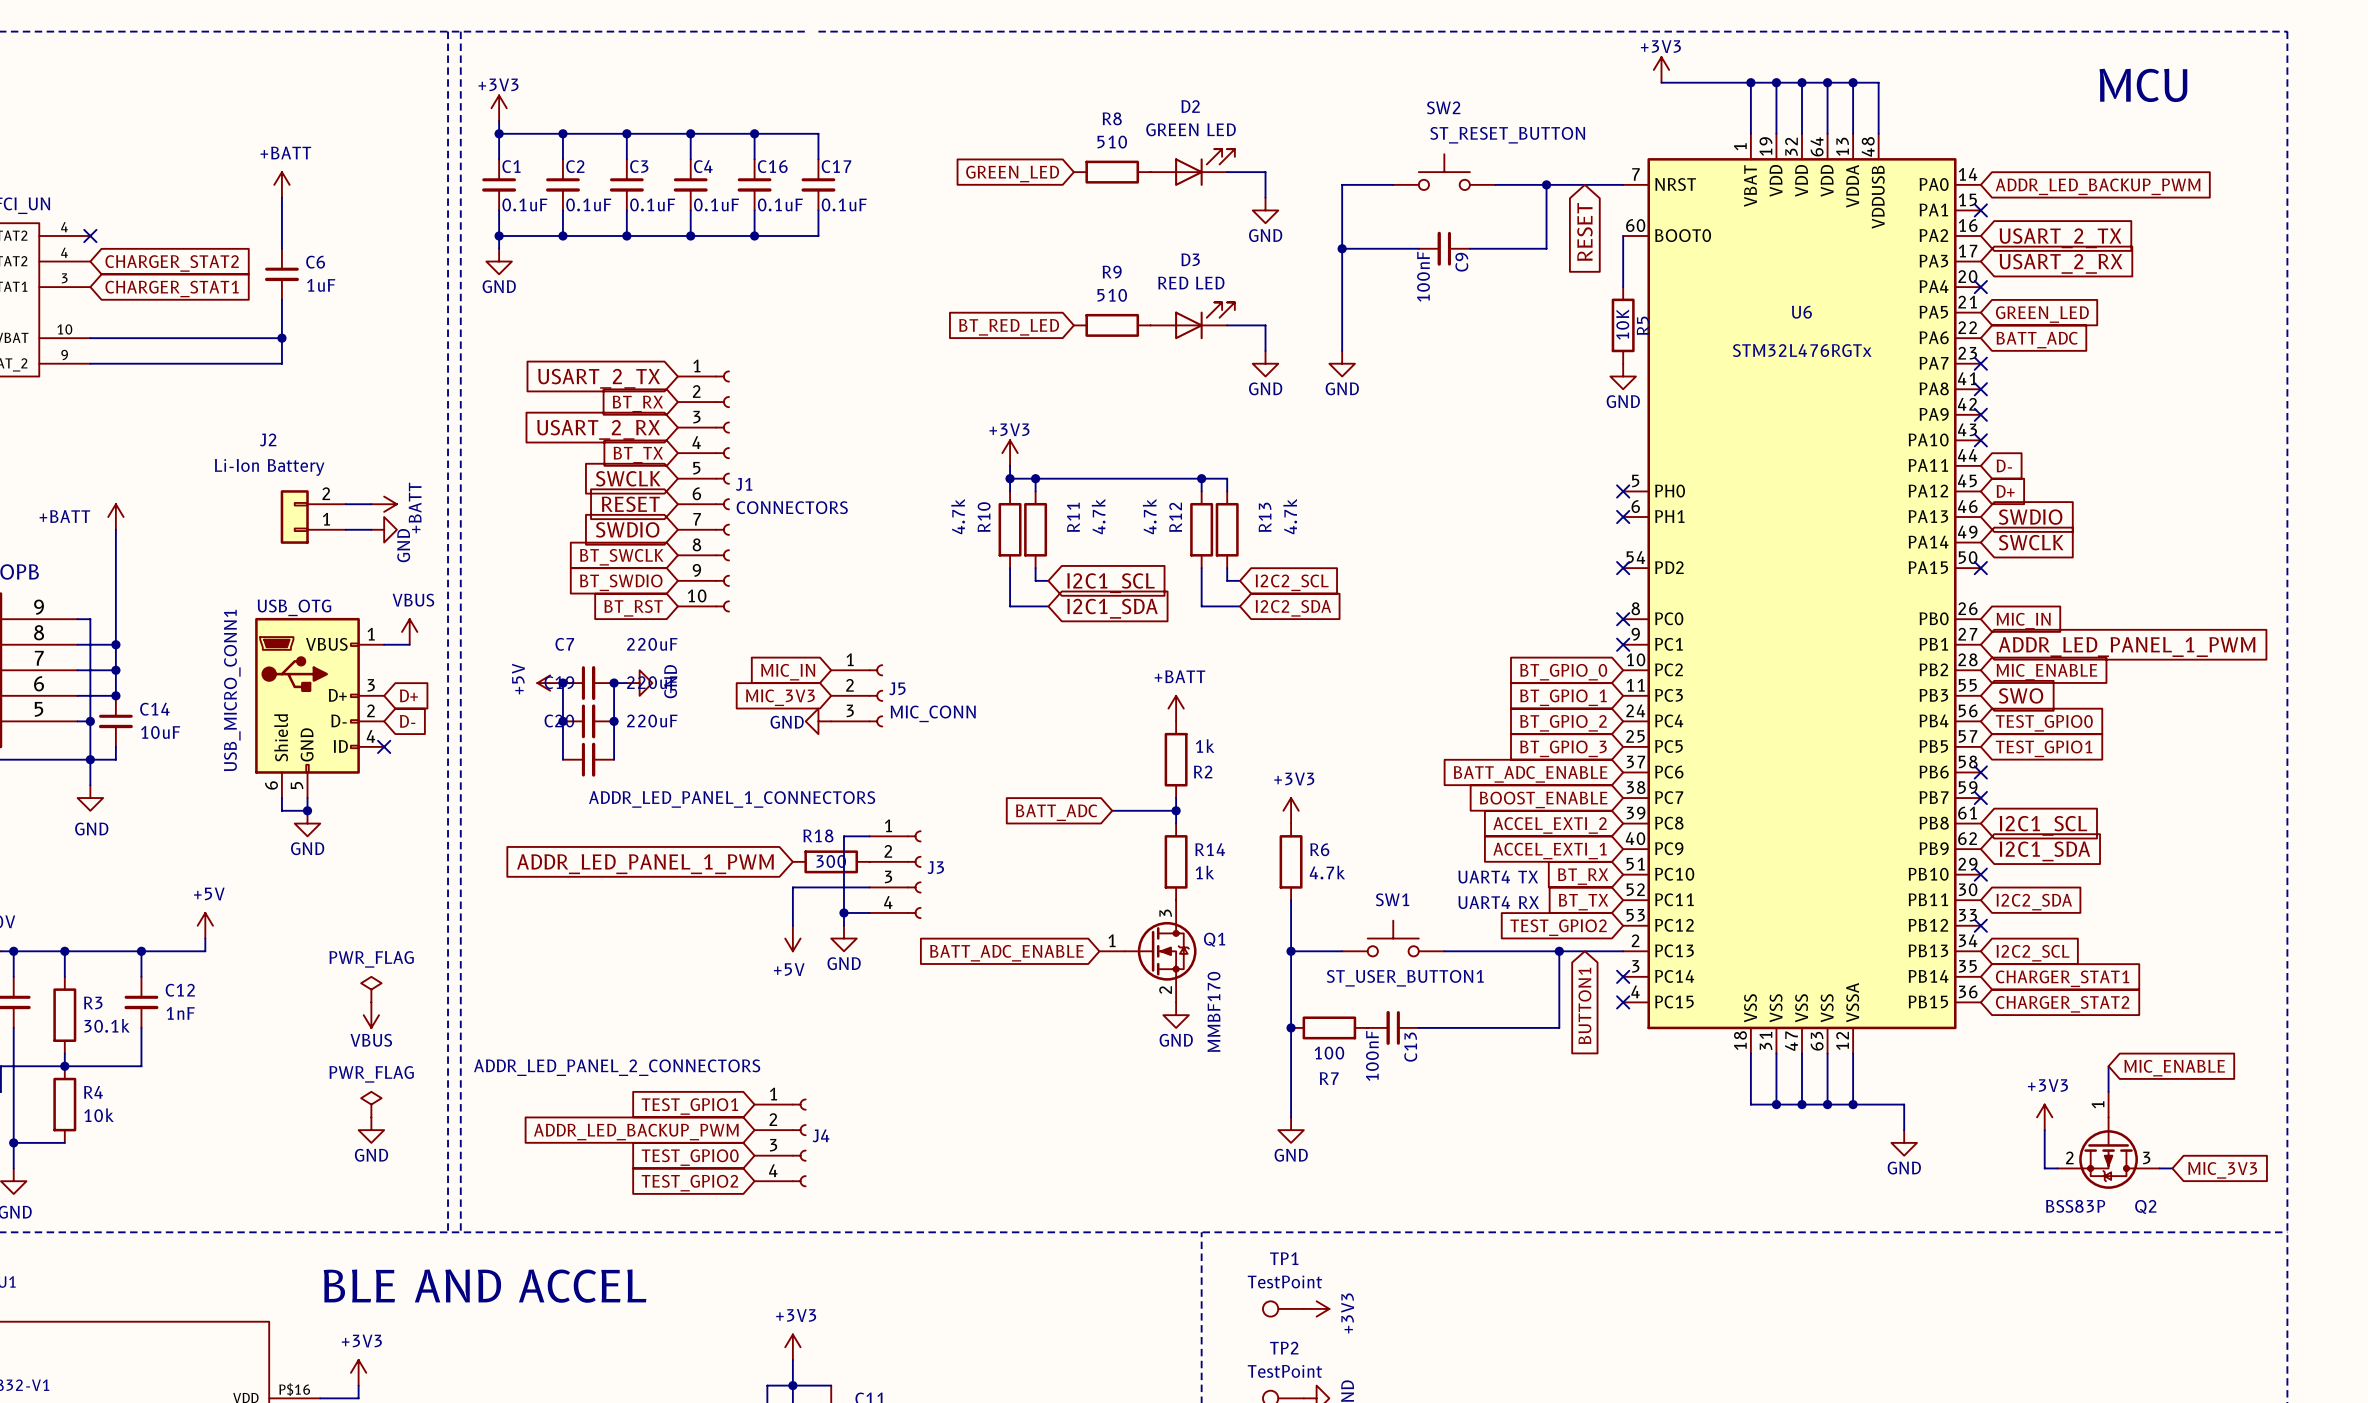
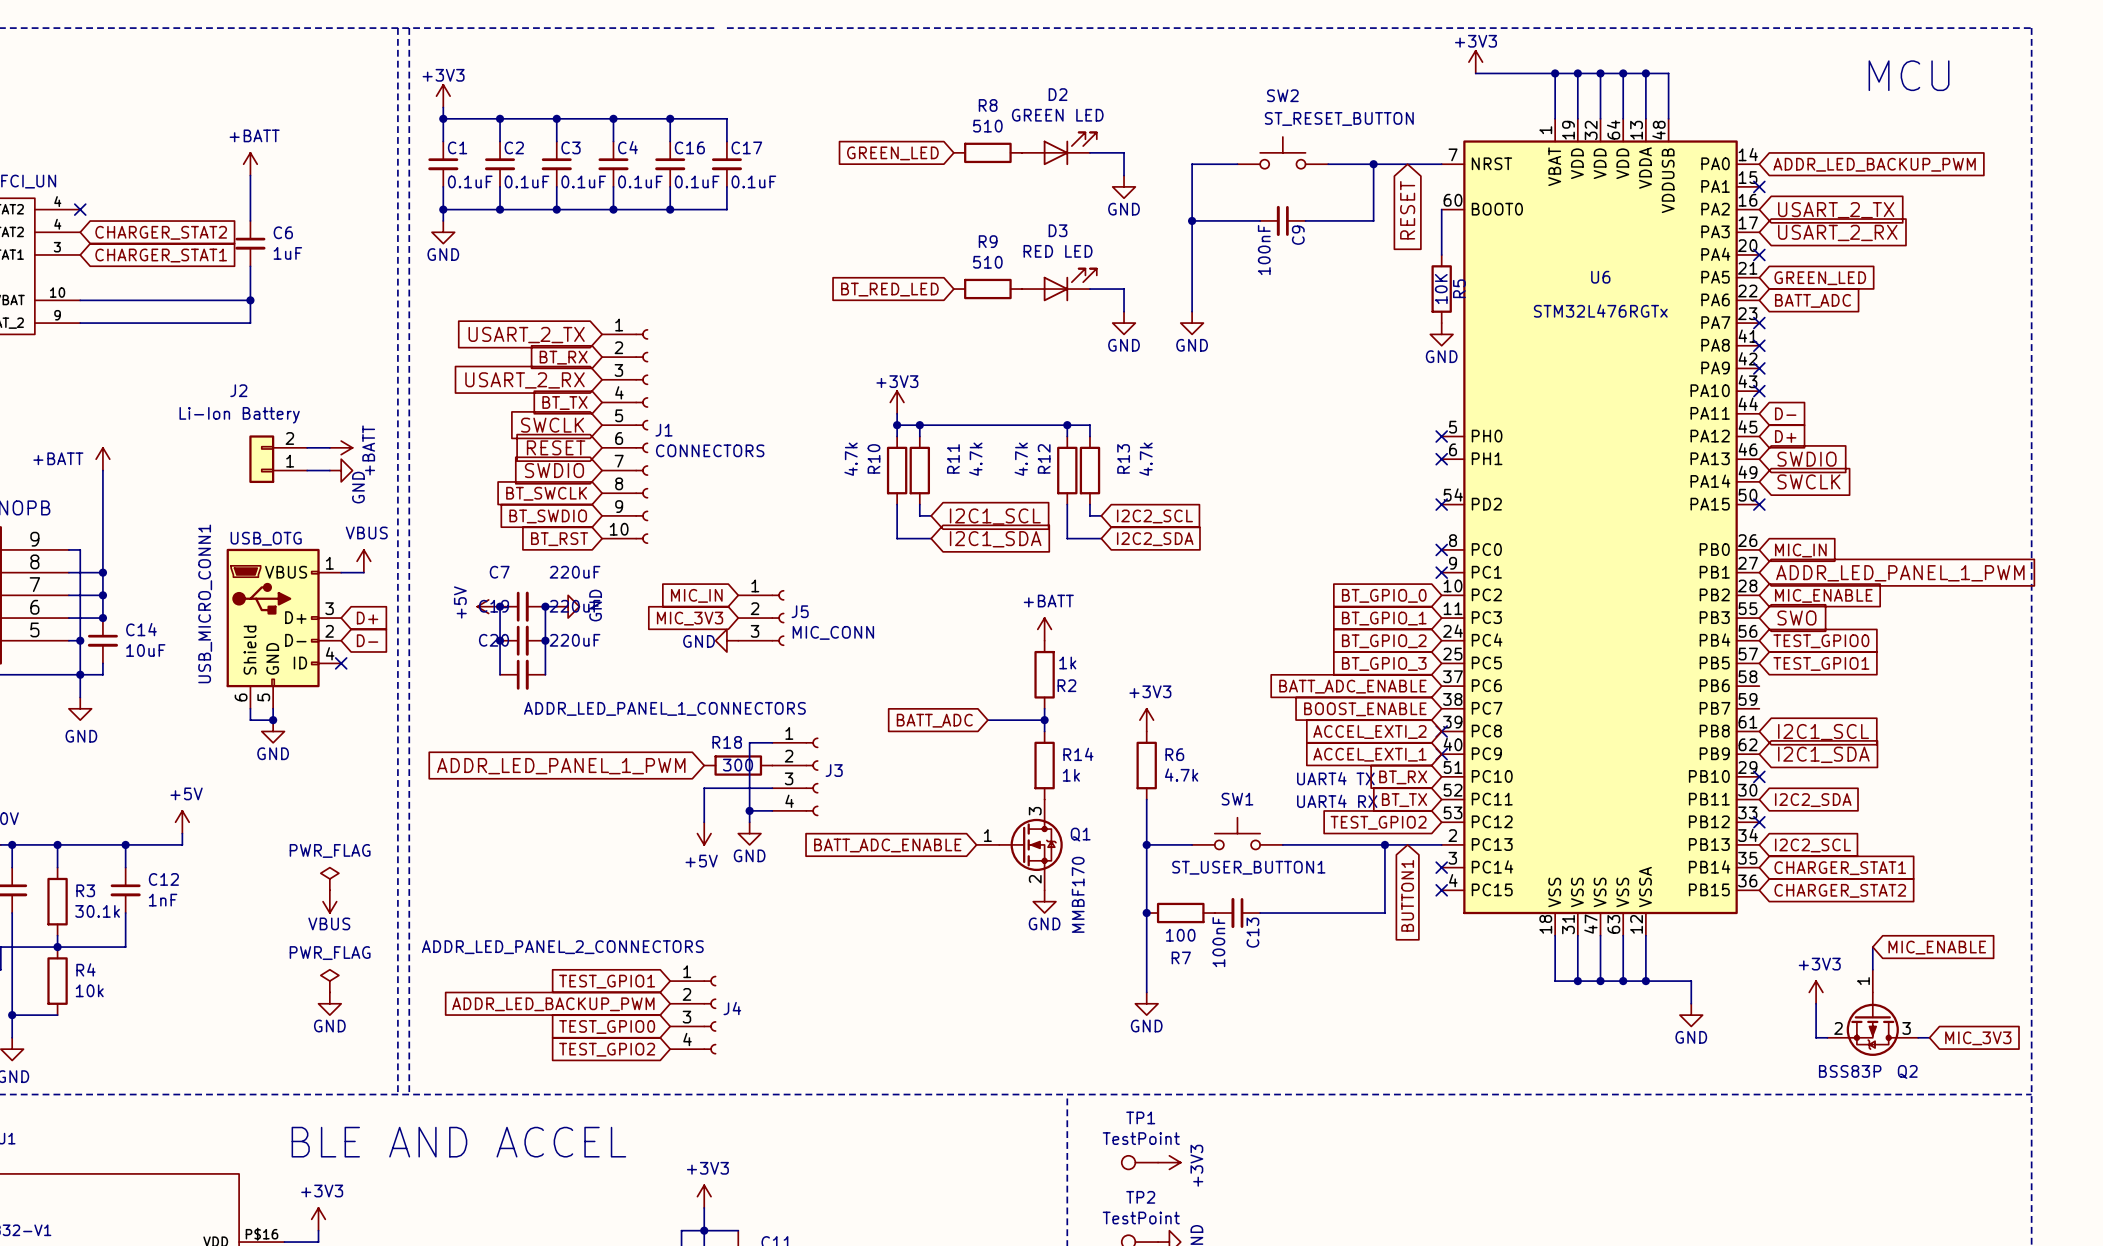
no-connect mark: (1980, 772) -> none
no-connect mark: (1980, 798) -> none
no-connect mark: none -> (1441, 731)
no-connect mark: none -> (1441, 754)

